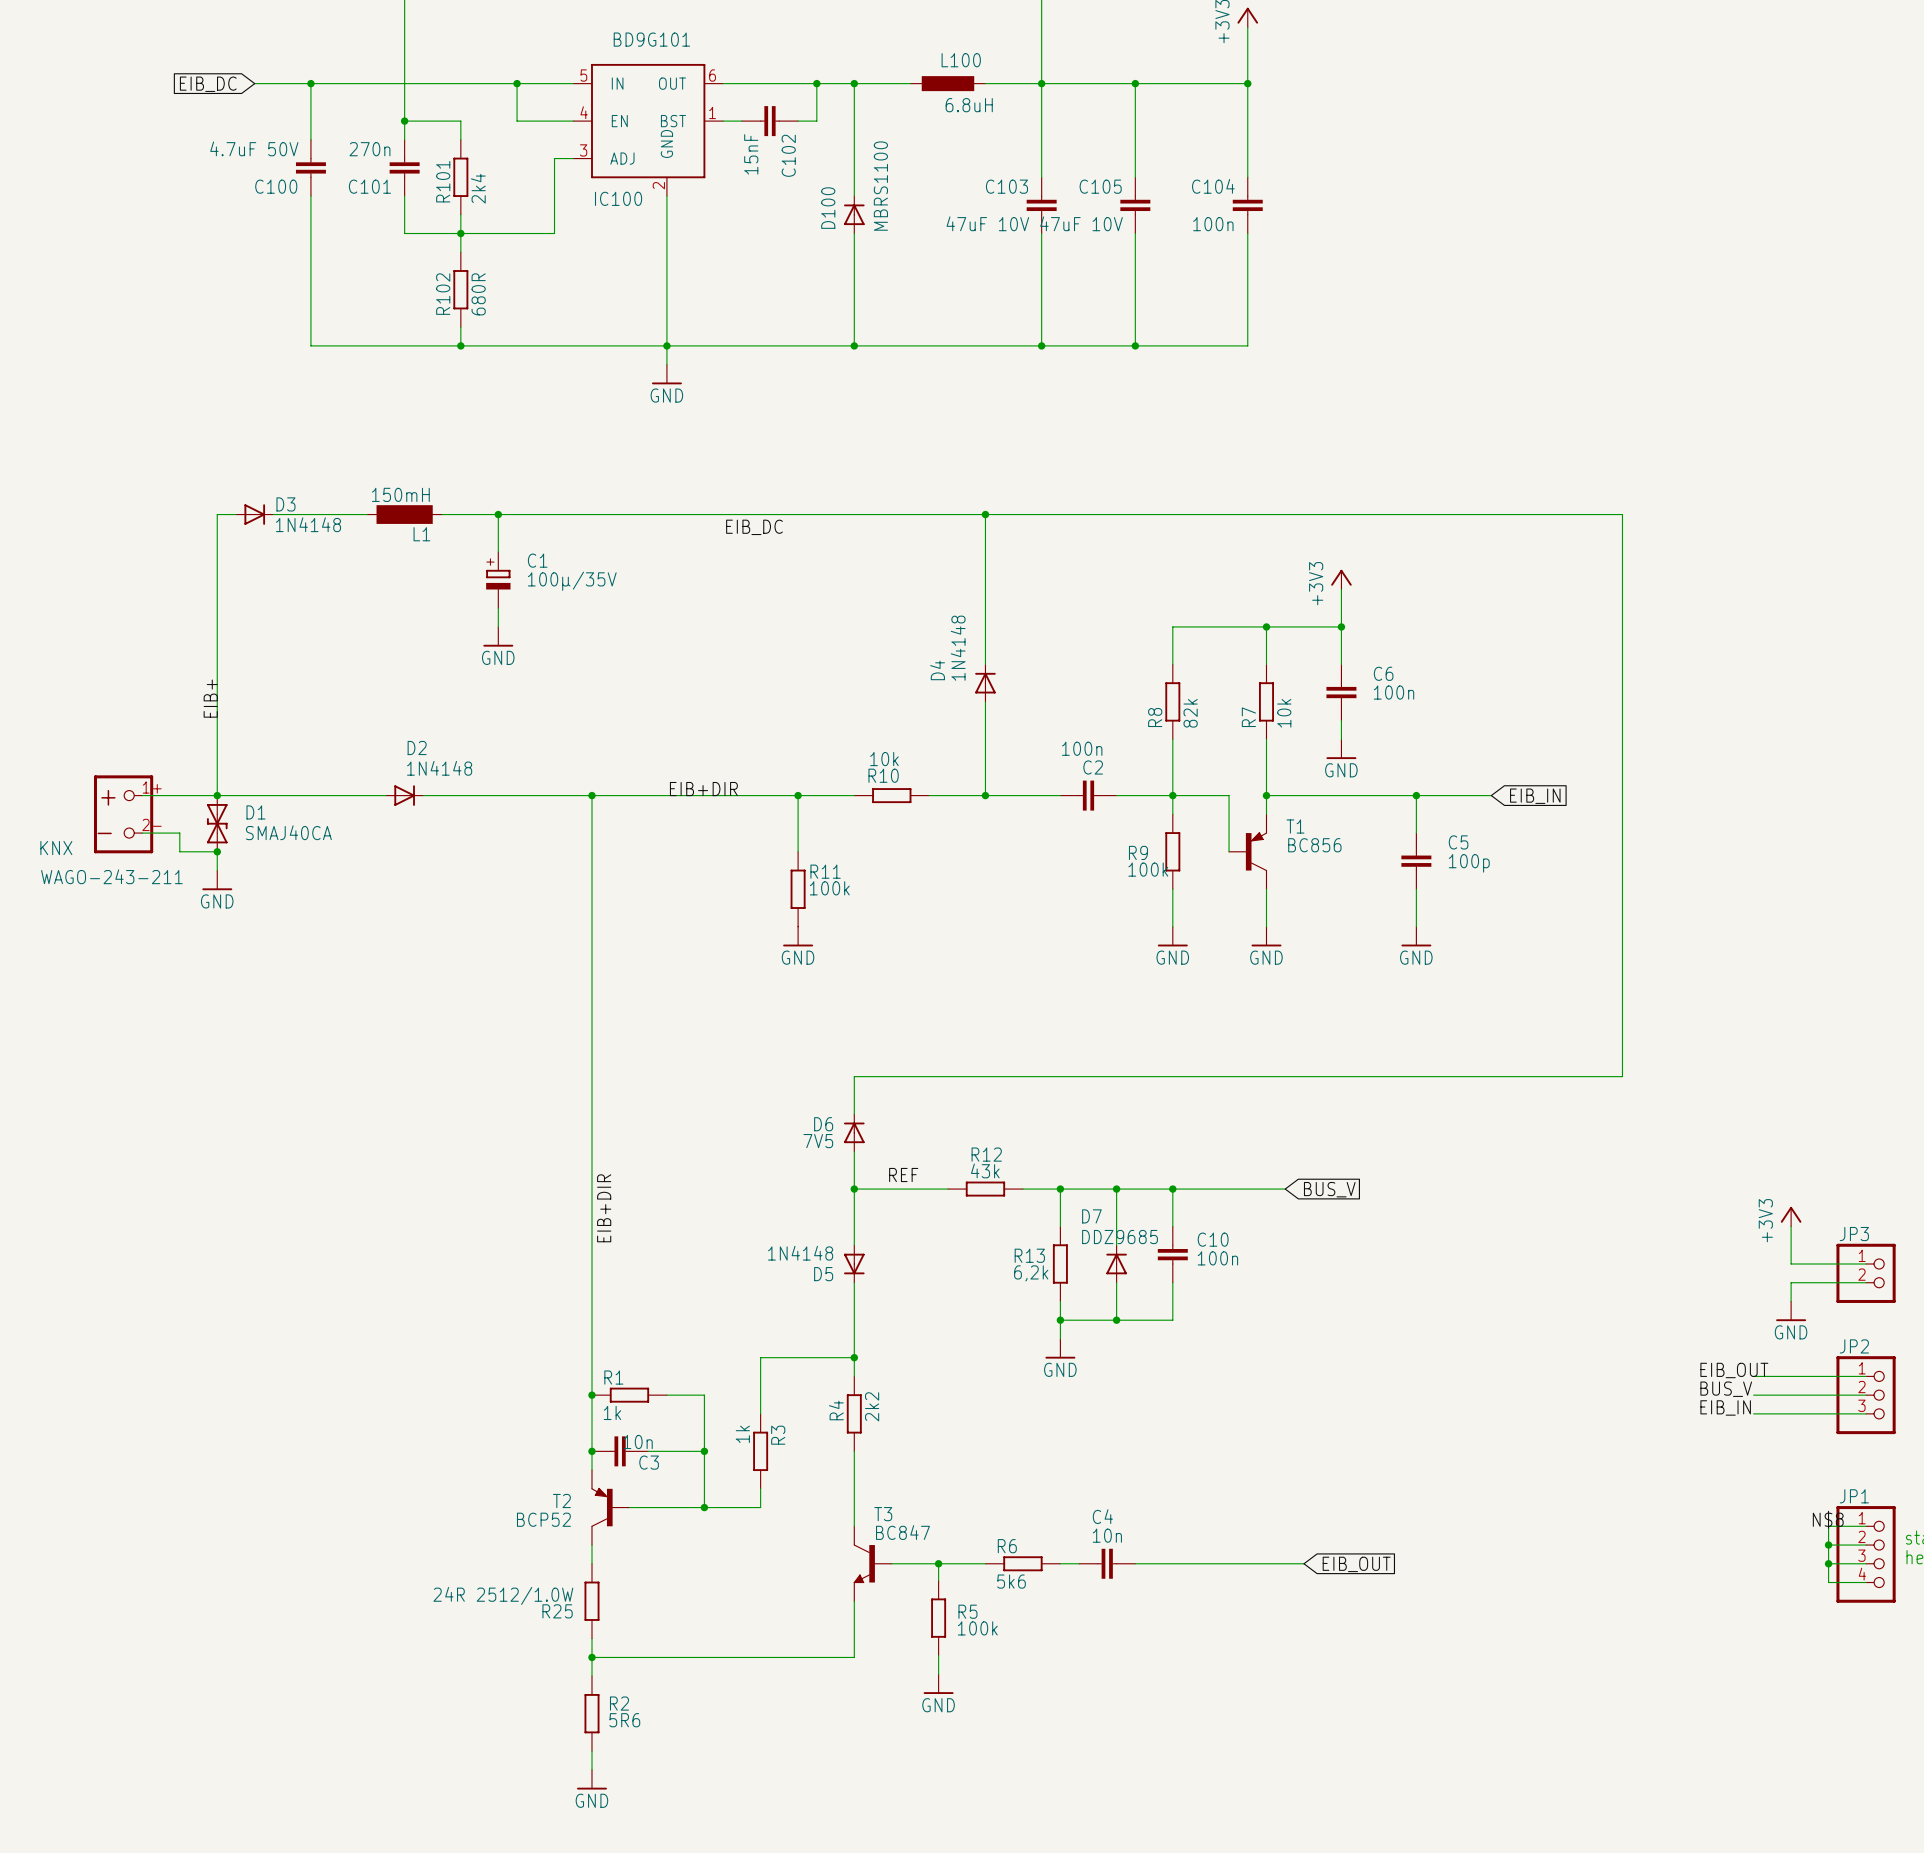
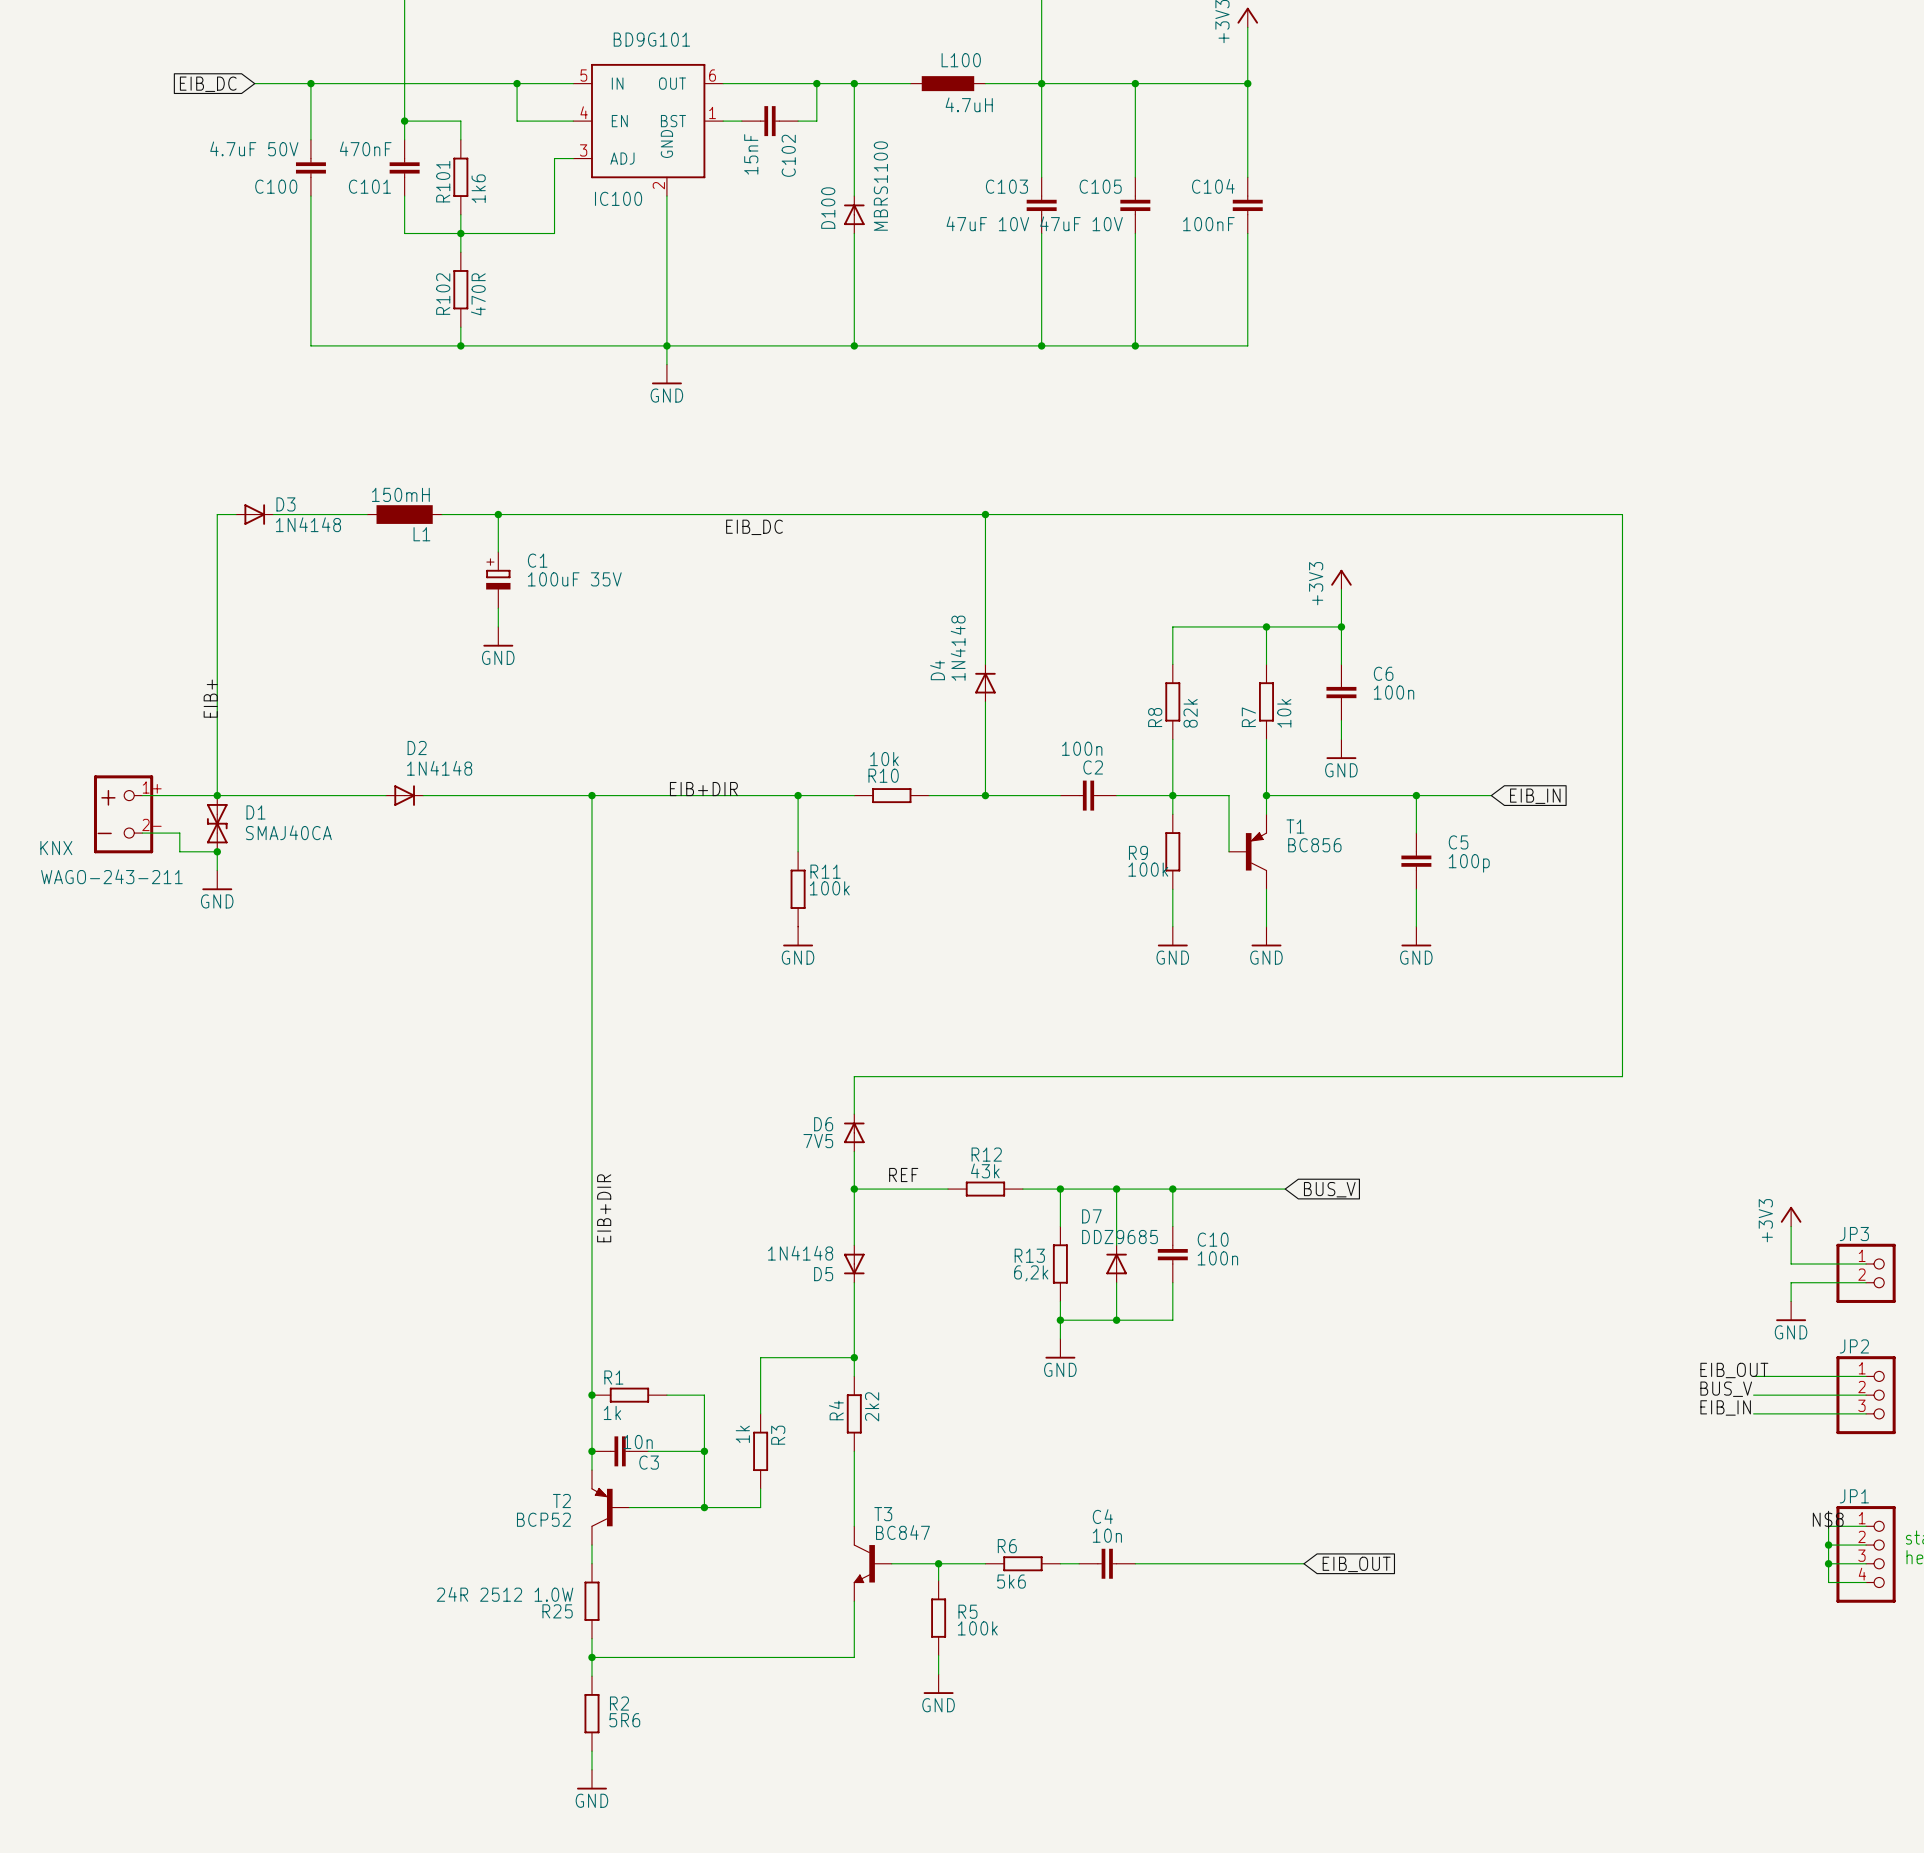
L100 value: 6.8uH (969, 105) -> 4.7uH (969, 104)
C101 value: 270n (369, 149) -> 470nF (365, 148)
R101 value: 2k4 (478, 188) -> 1k6 (478, 188)
C104 value: 100n (1213, 224) -> 100nF (1208, 224)
R102 value: 680R (478, 294) -> 470R (478, 294)
C1 value: 100µ/35V (572, 581) -> 100uF 35V (574, 579)
R25 value: 24R 2512/1.0W (503, 1595) -> 24R 2512 1.0W (505, 1594)

